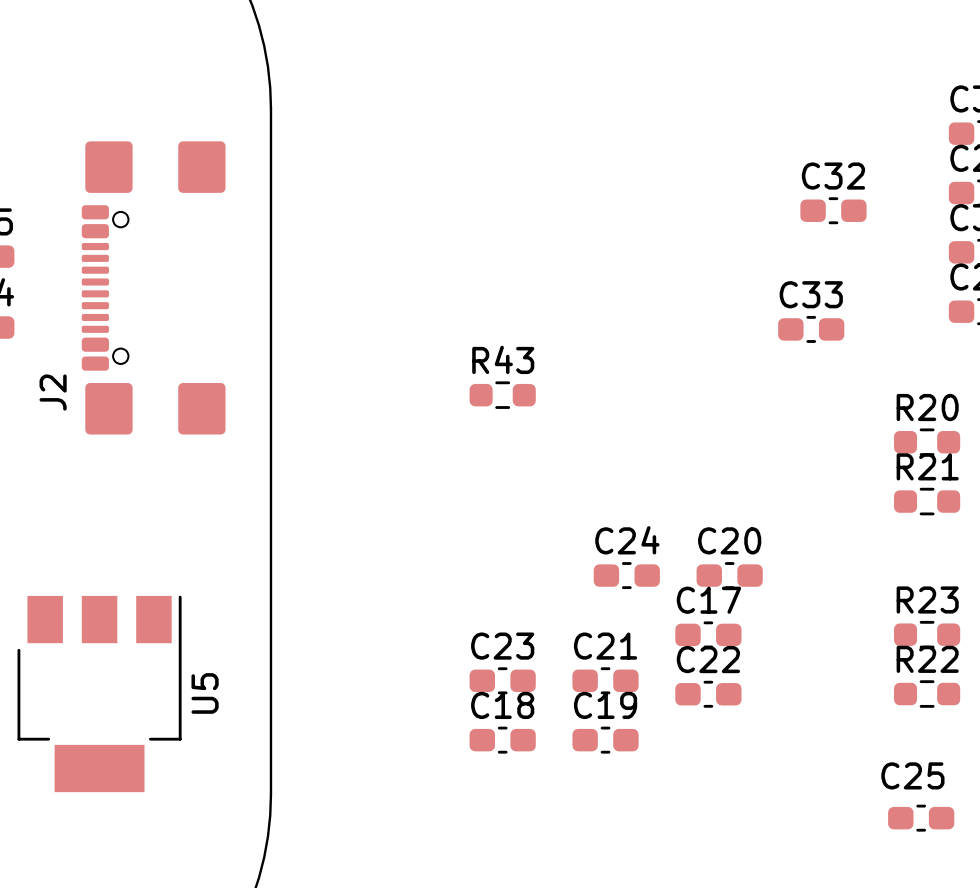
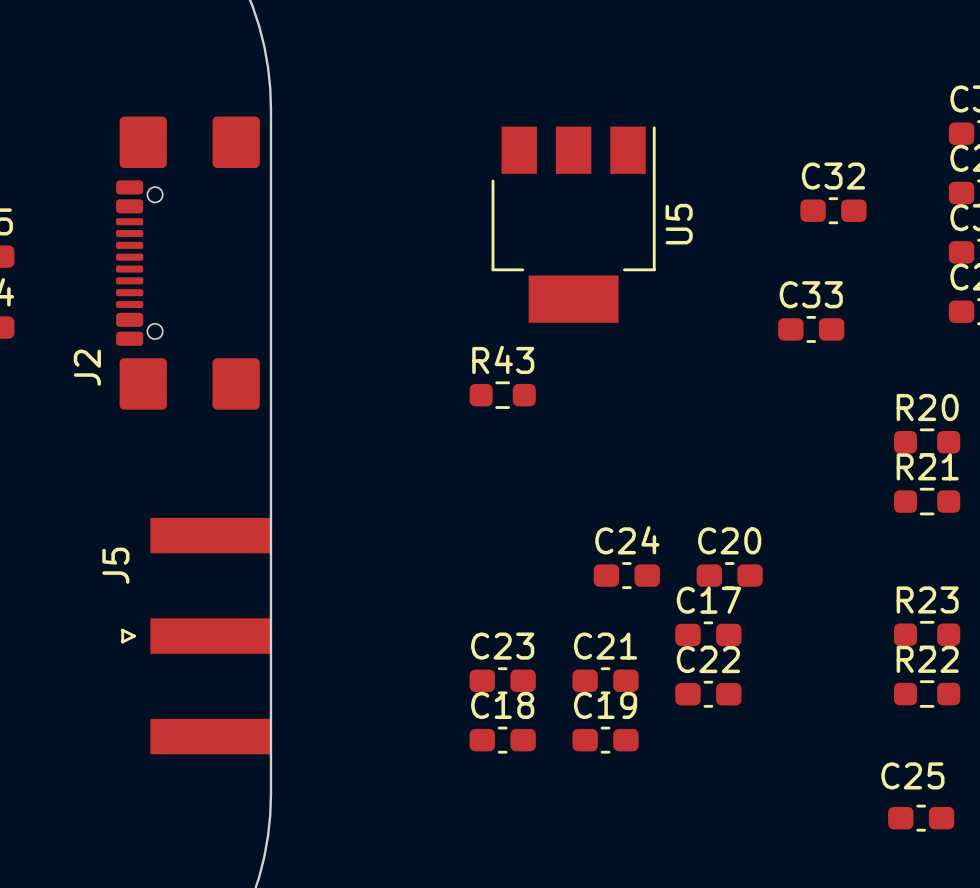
J2 position: (153, 287) -> (187, 263)
J5: none -> (195, 636)
U5 position: (99, 693) -> (573, 224)

